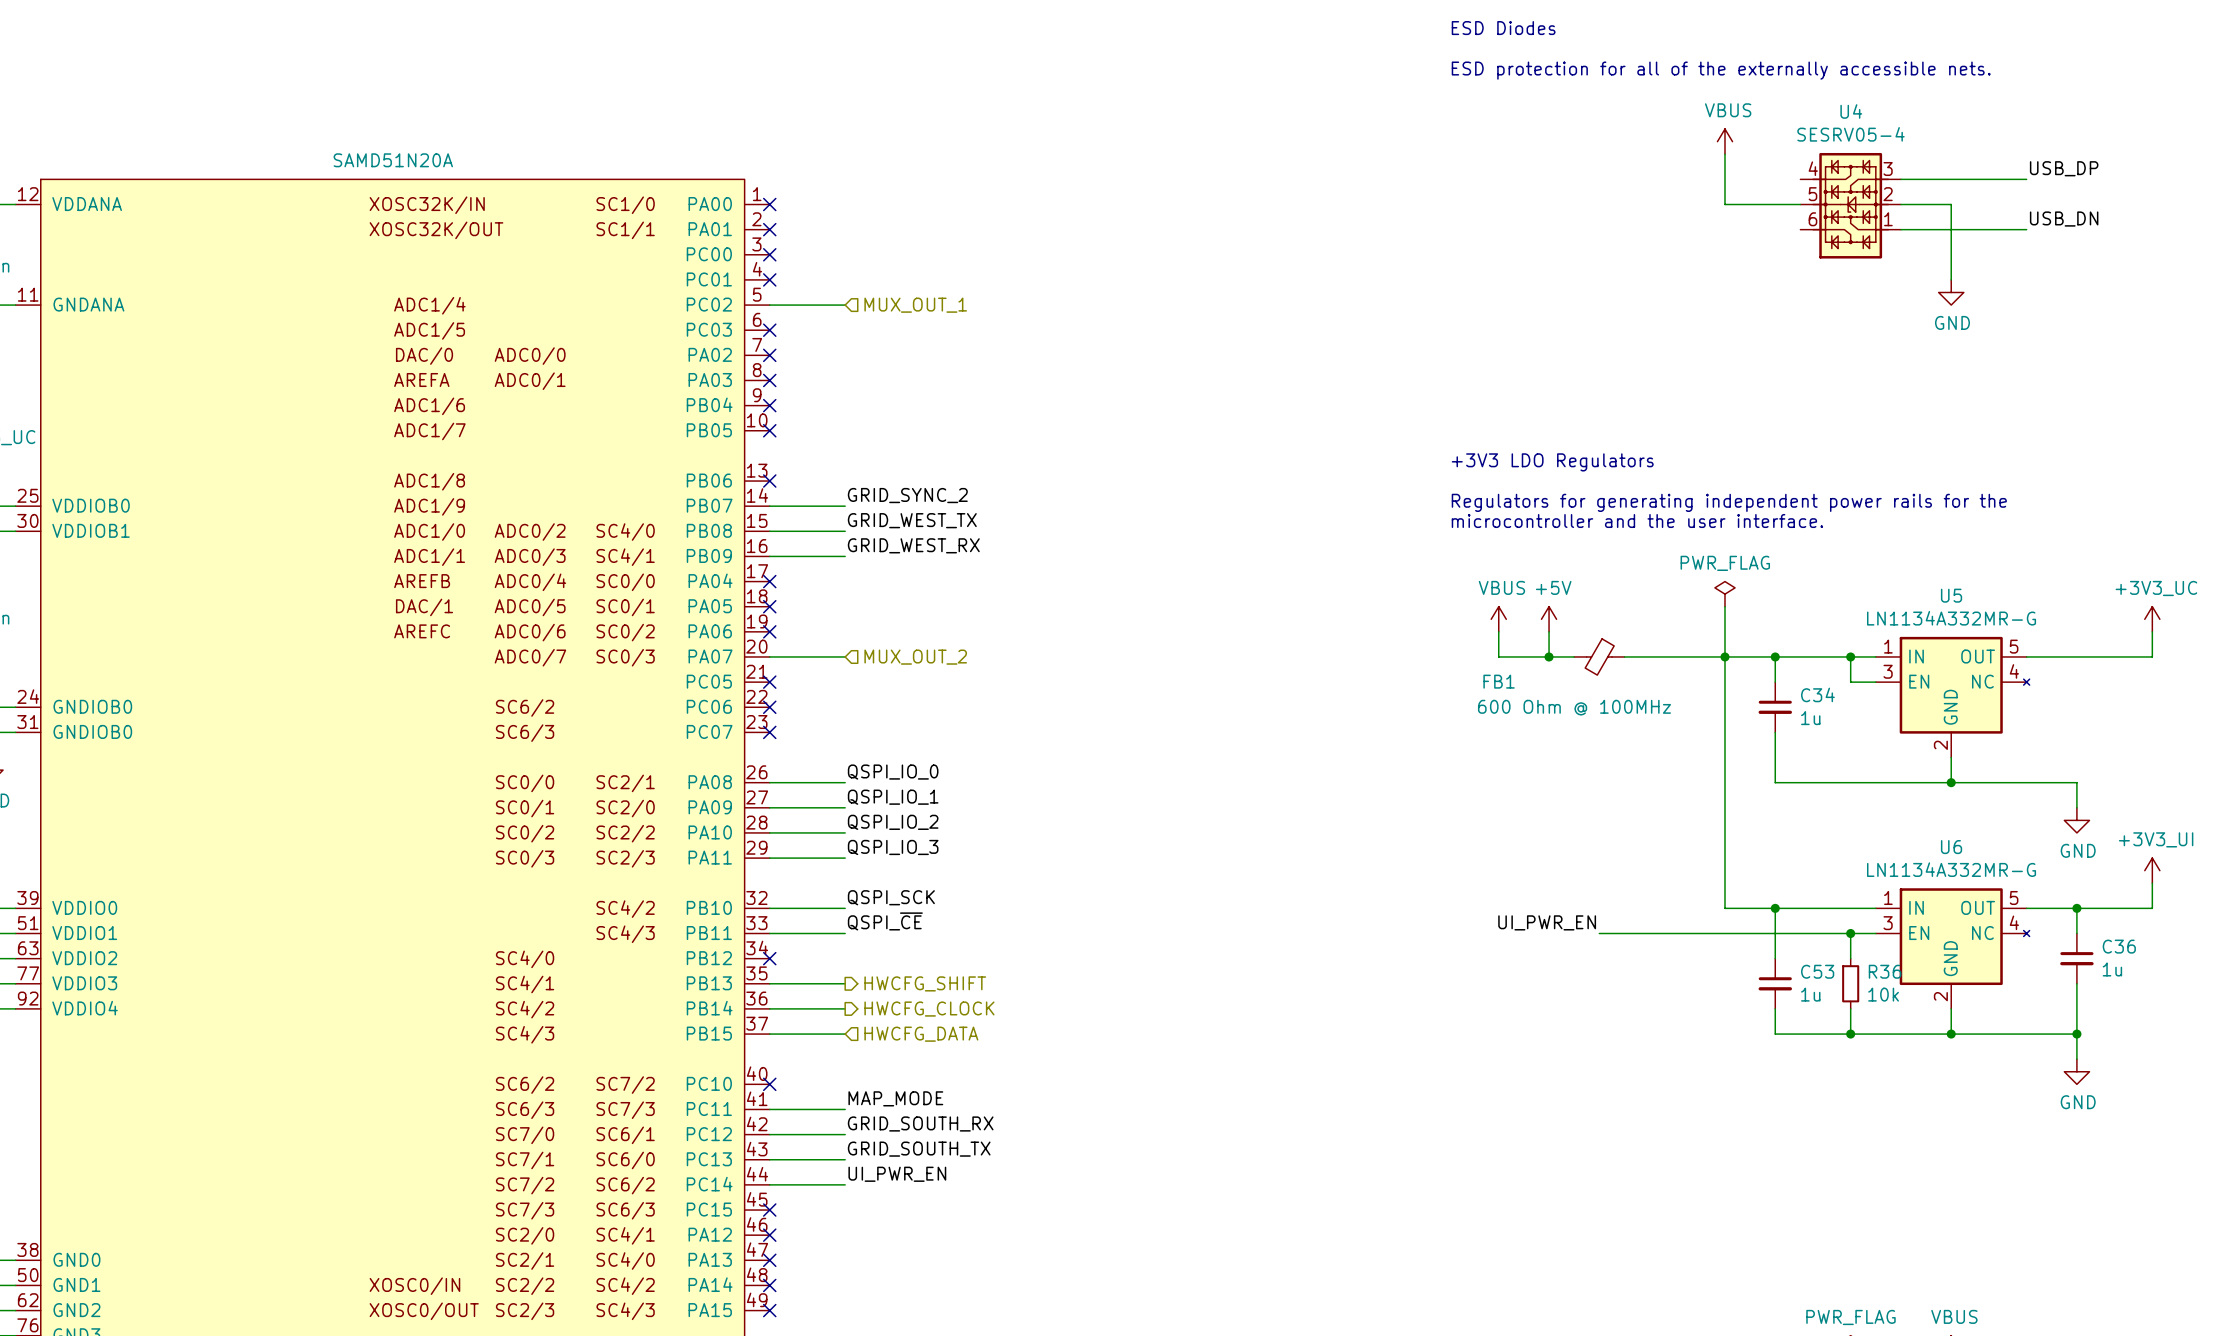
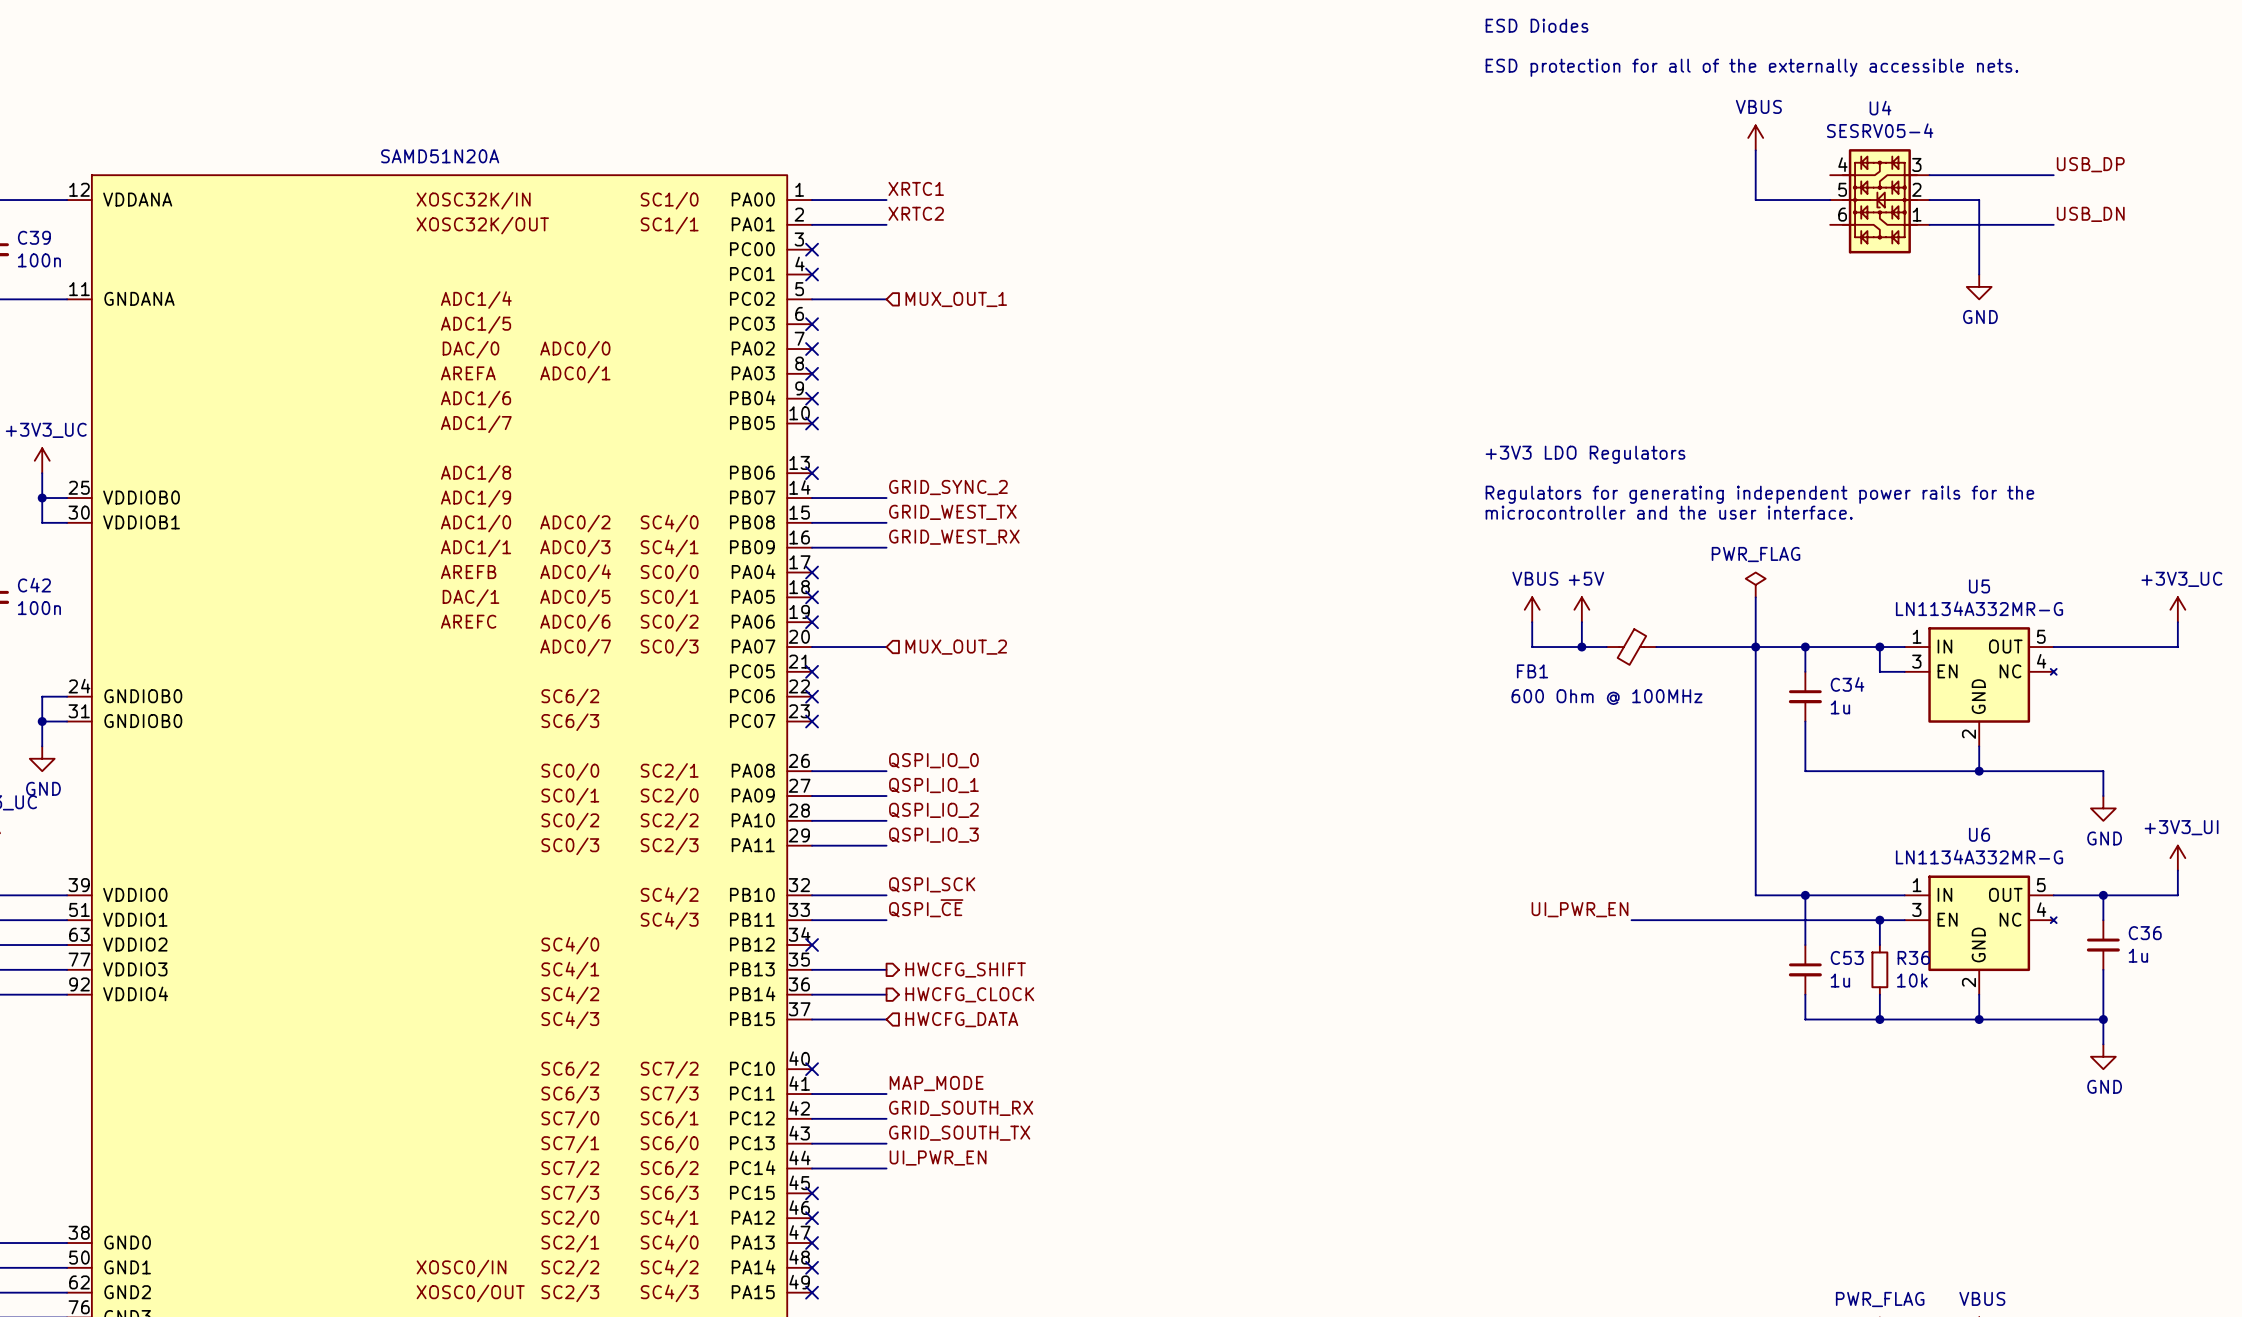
label: none -> XRTC1 (916, 188)
wire: none -> (812, 200) (886, 200)
no-connect mark: (769, 204) -> none
label: none -> XRTC2 (916, 213)
wire: none -> (812, 224) (886, 224)
no-connect mark: (769, 229) -> none

